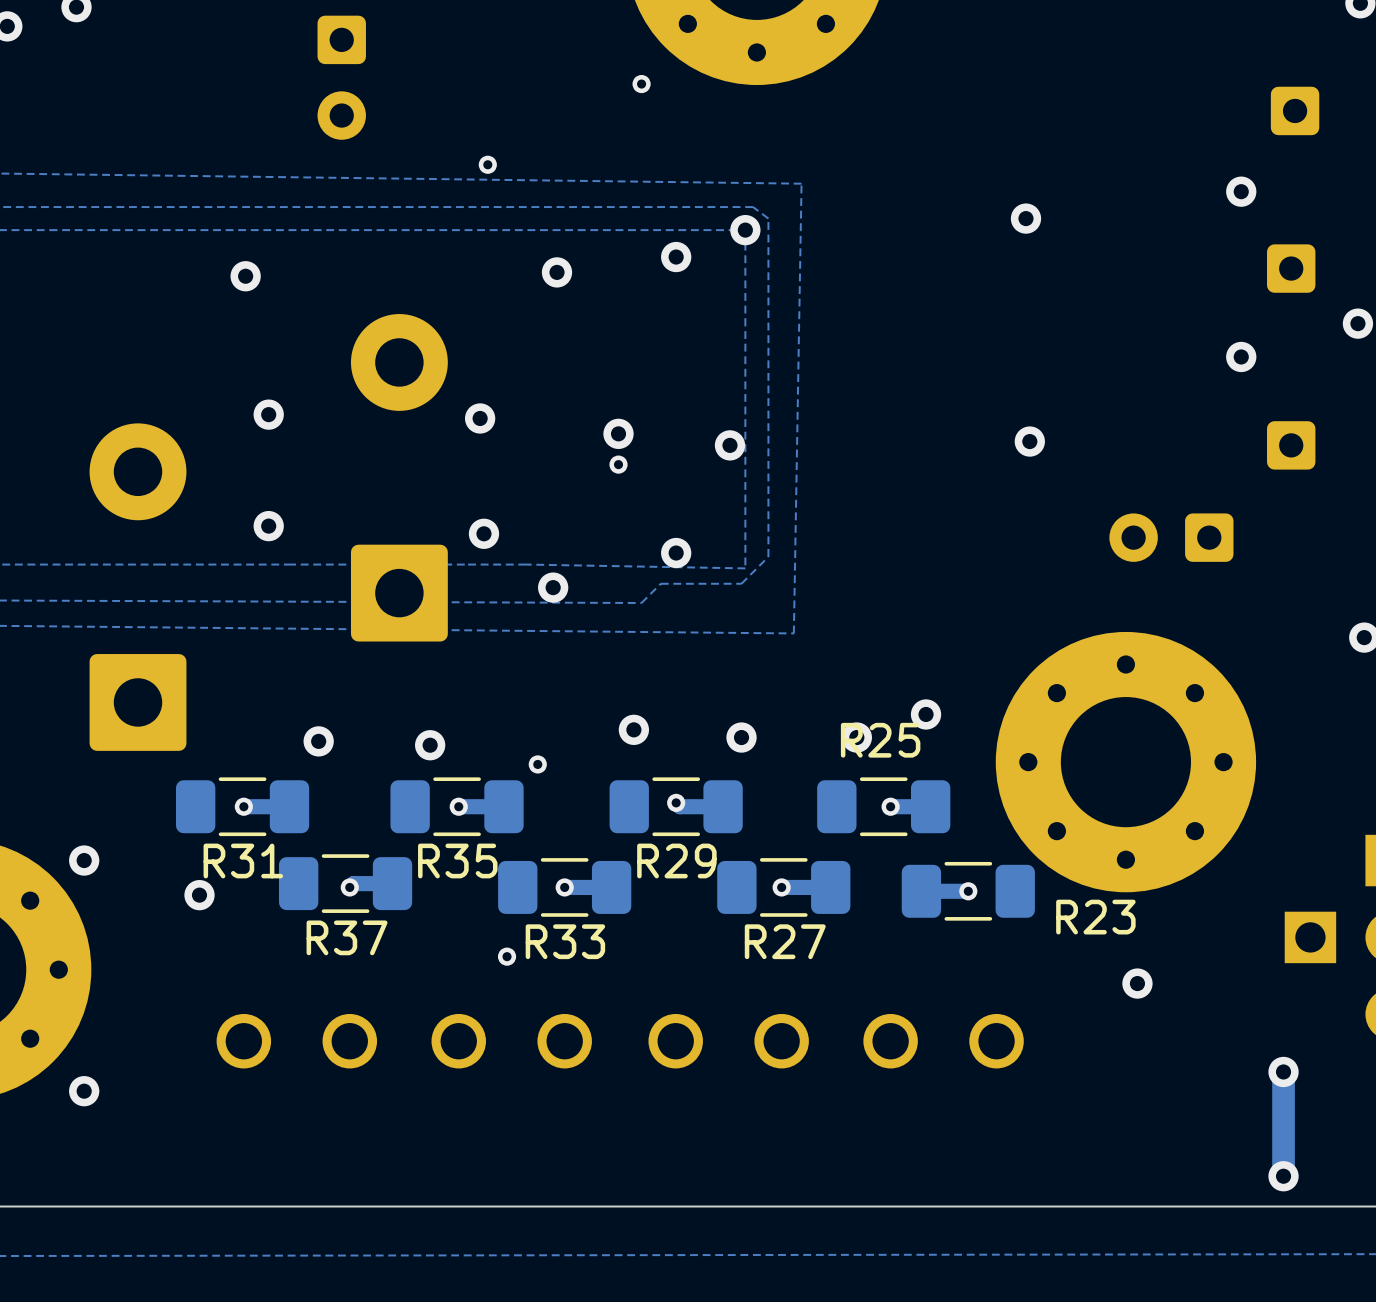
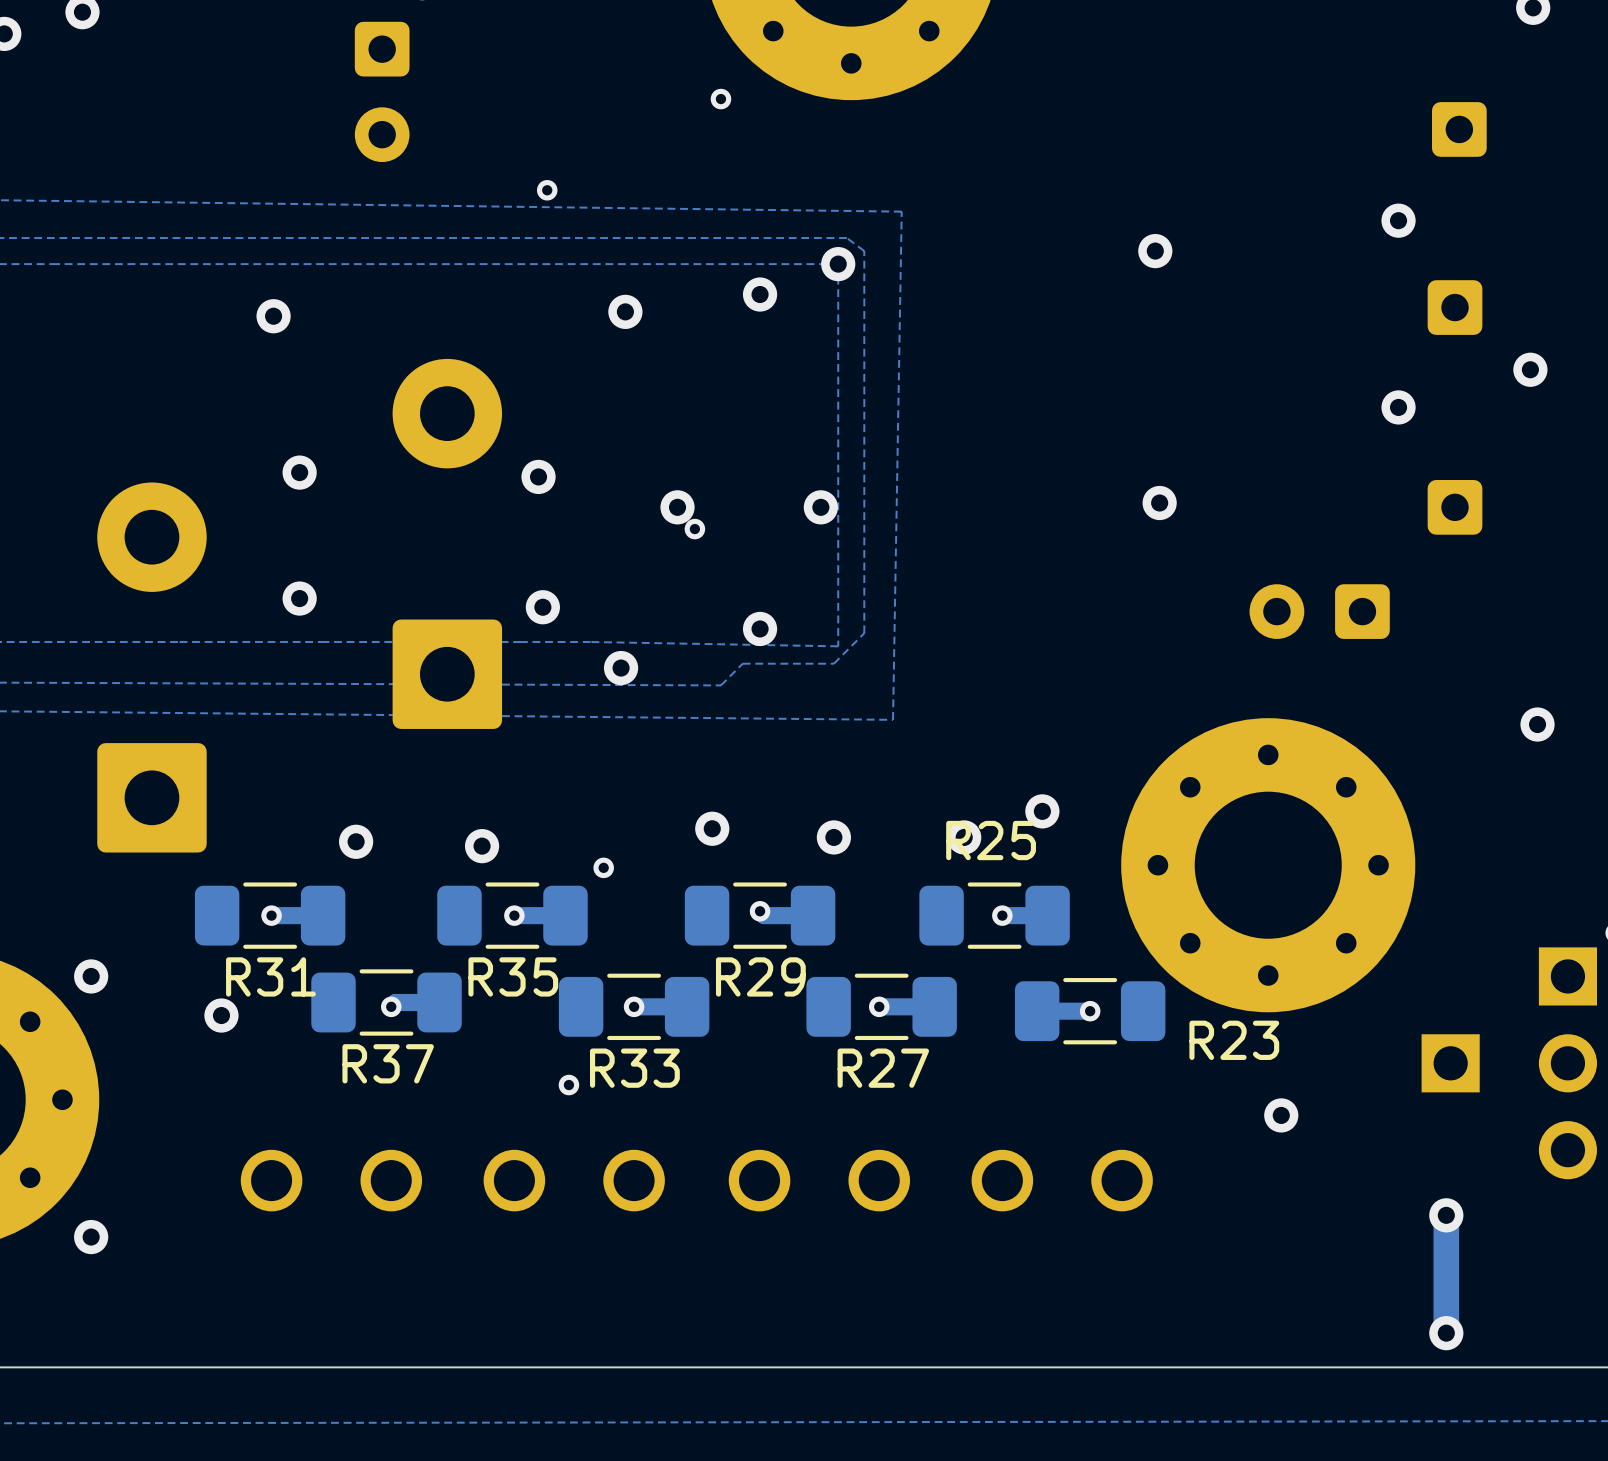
via position: (618, 433) -> (677, 507)
part position: (1310, 937) -> (1450, 1063)

